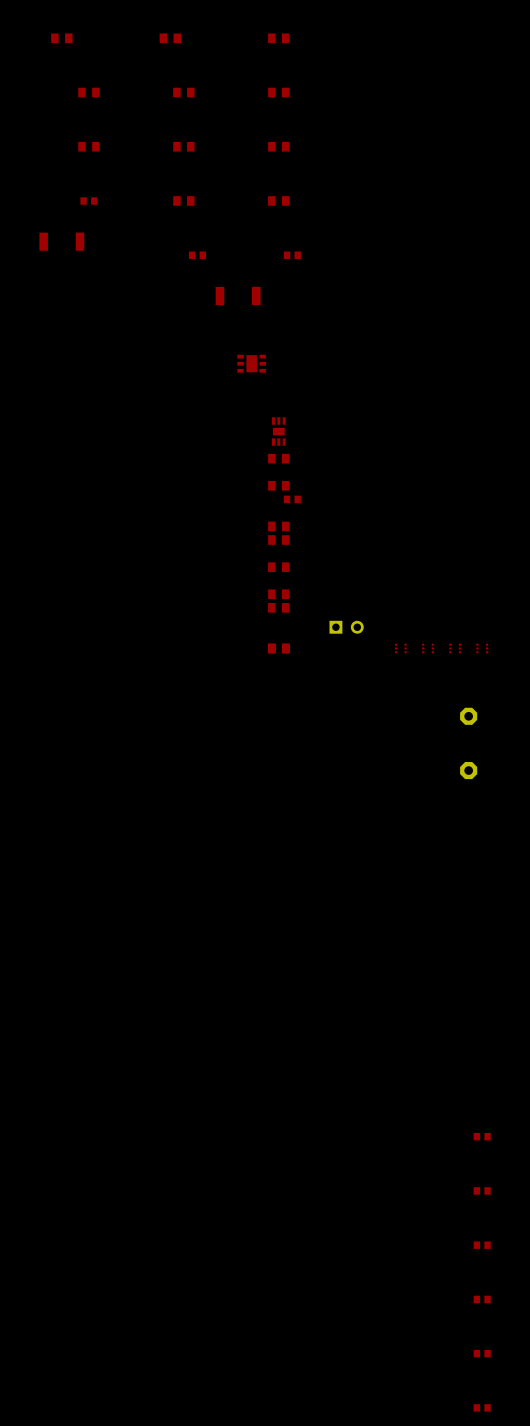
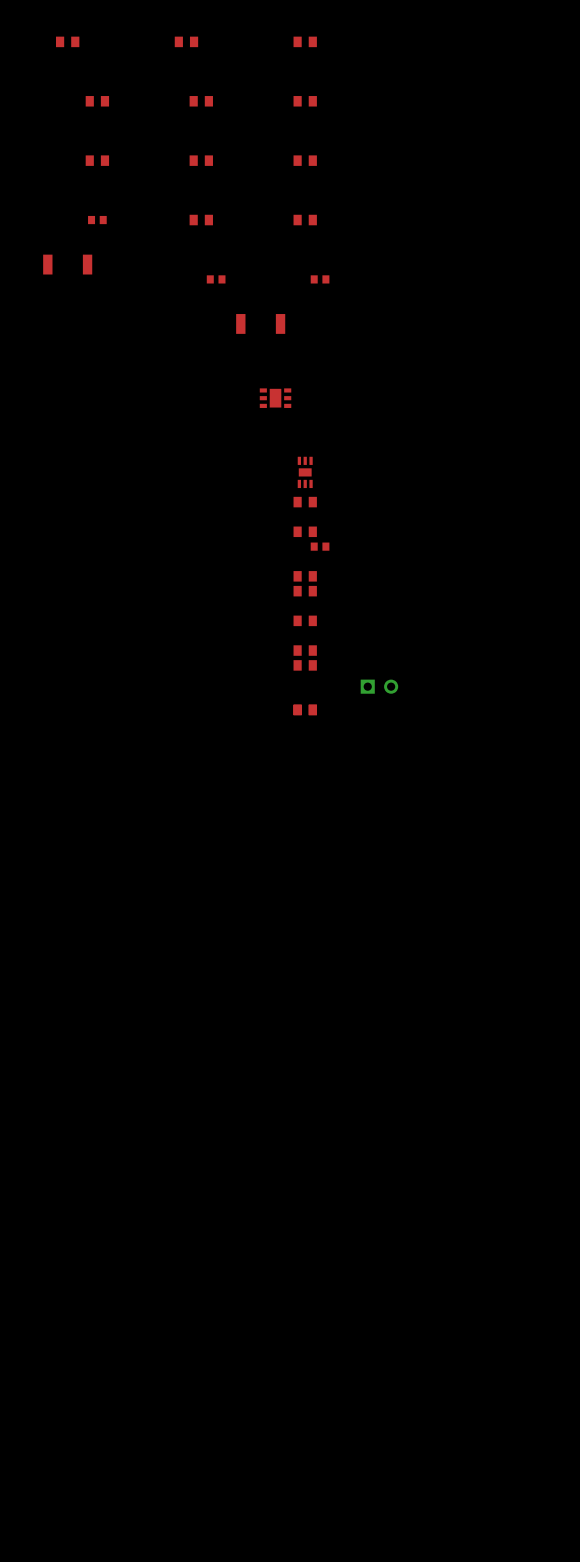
part: (400, 648) -> none
part: (427, 648) -> none
part: (455, 648) -> none
part: (482, 648) -> none
part: (468, 716) -> none
part: (468, 770) -> none
part: (482, 1136) -> none
part: (482, 1190) -> none
part: (482, 1245) -> none
part: (482, 1299) -> none
part: (482, 1353) -> none
part: (482, 1407) -> none

